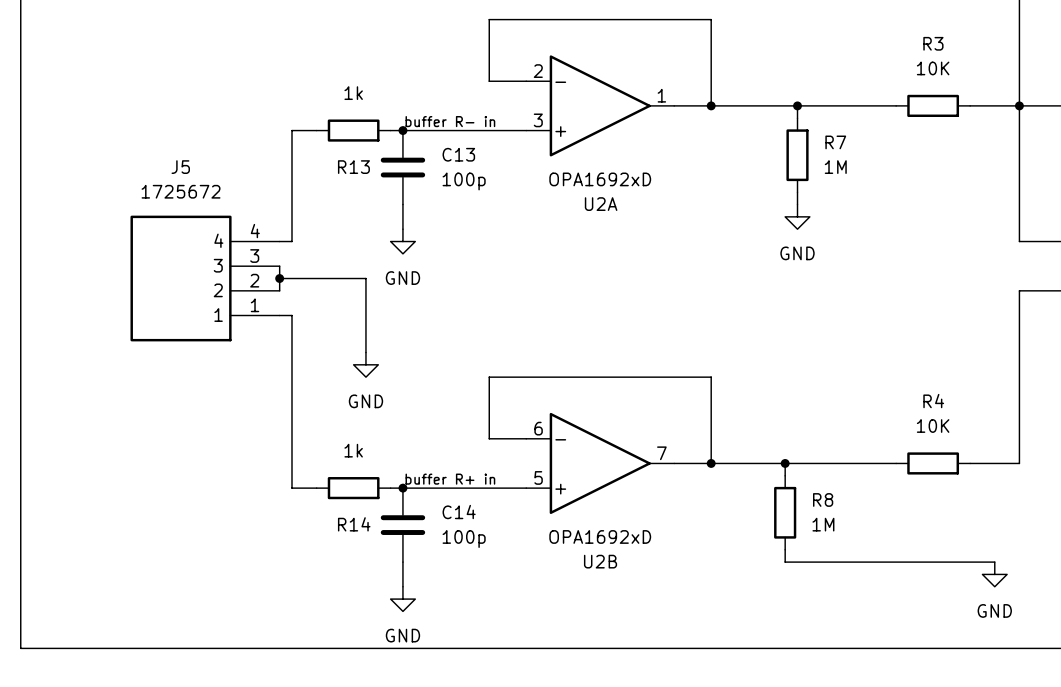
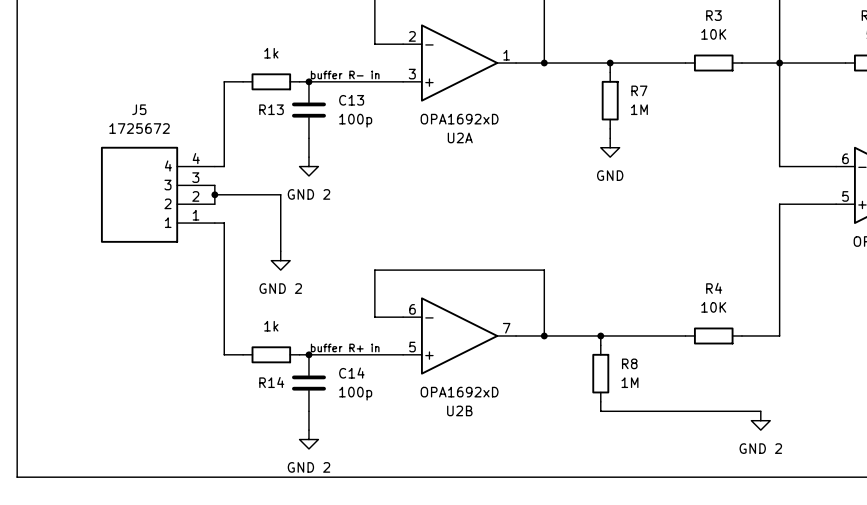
power symbol: GND (402, 241) -> GND 2 (308, 166)
power symbol: GND (365, 364) -> GND 2 (280, 260)
power symbol: GND (994, 574) -> GND 2 (760, 420)
power symbol: GND (402, 599) -> GND 2 (308, 439)

